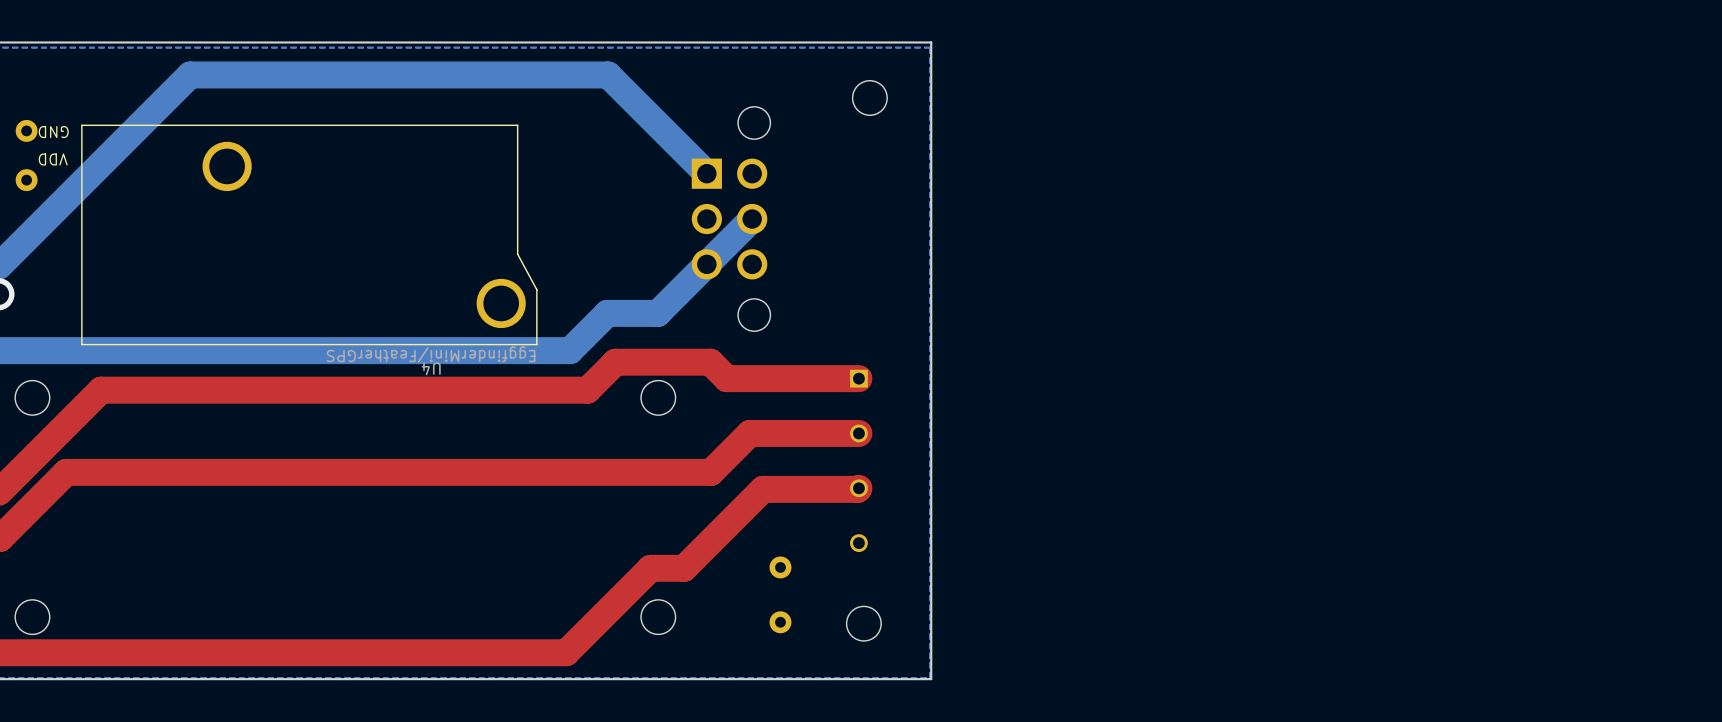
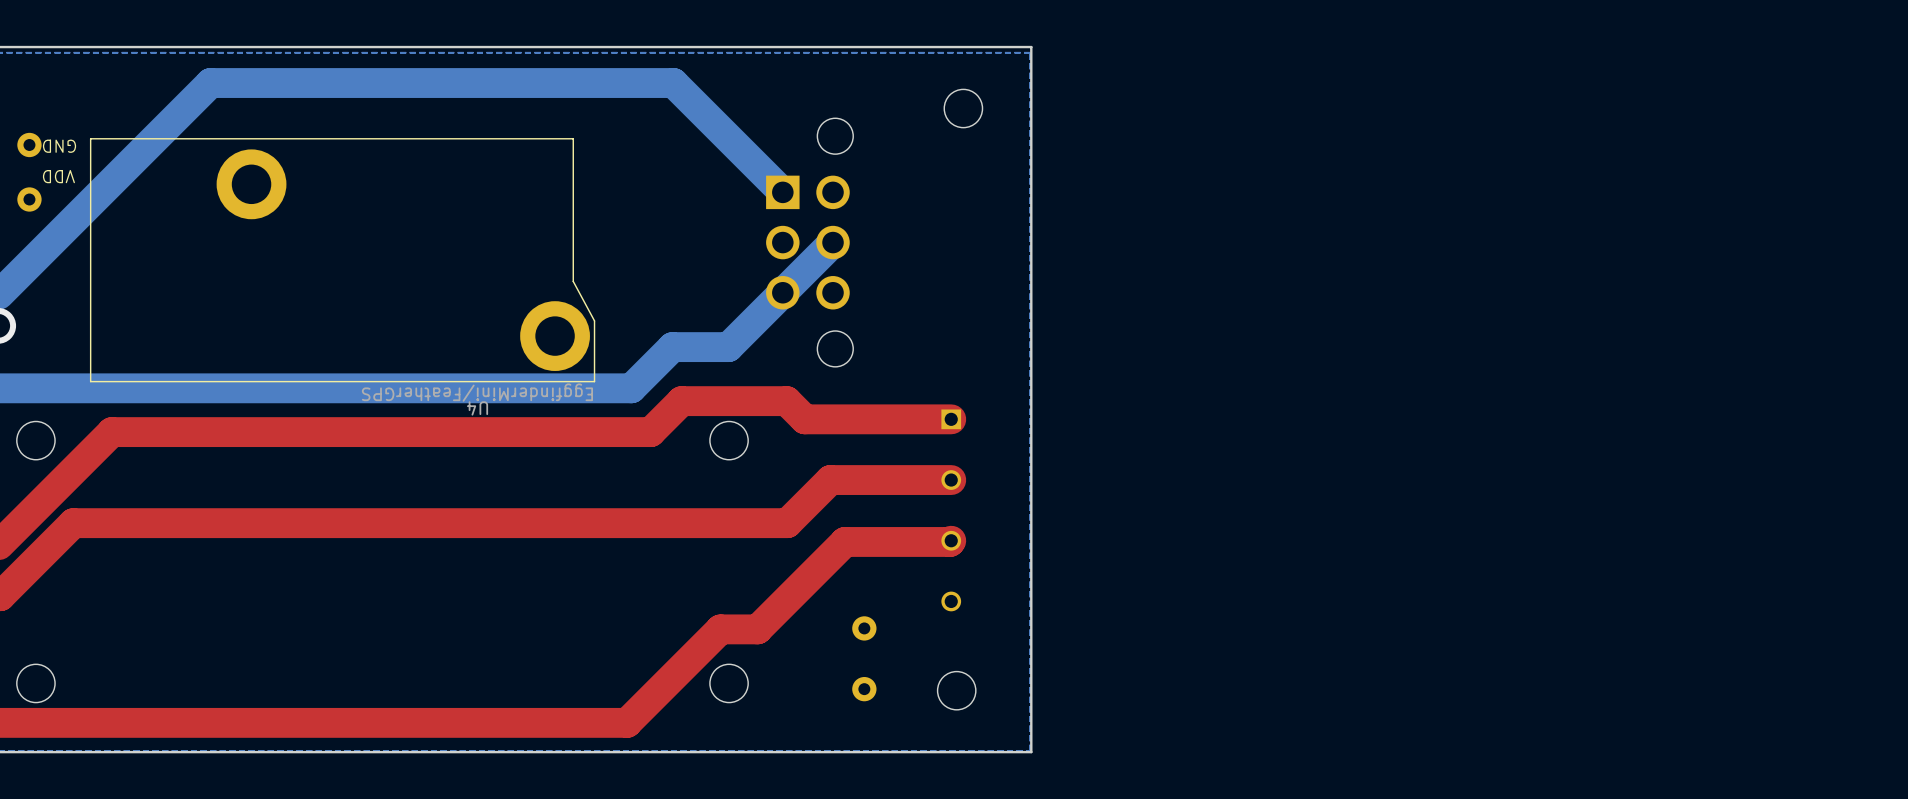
U4 footprint: [15, 119, 538, 346] -> [17, 132, 596, 383]

